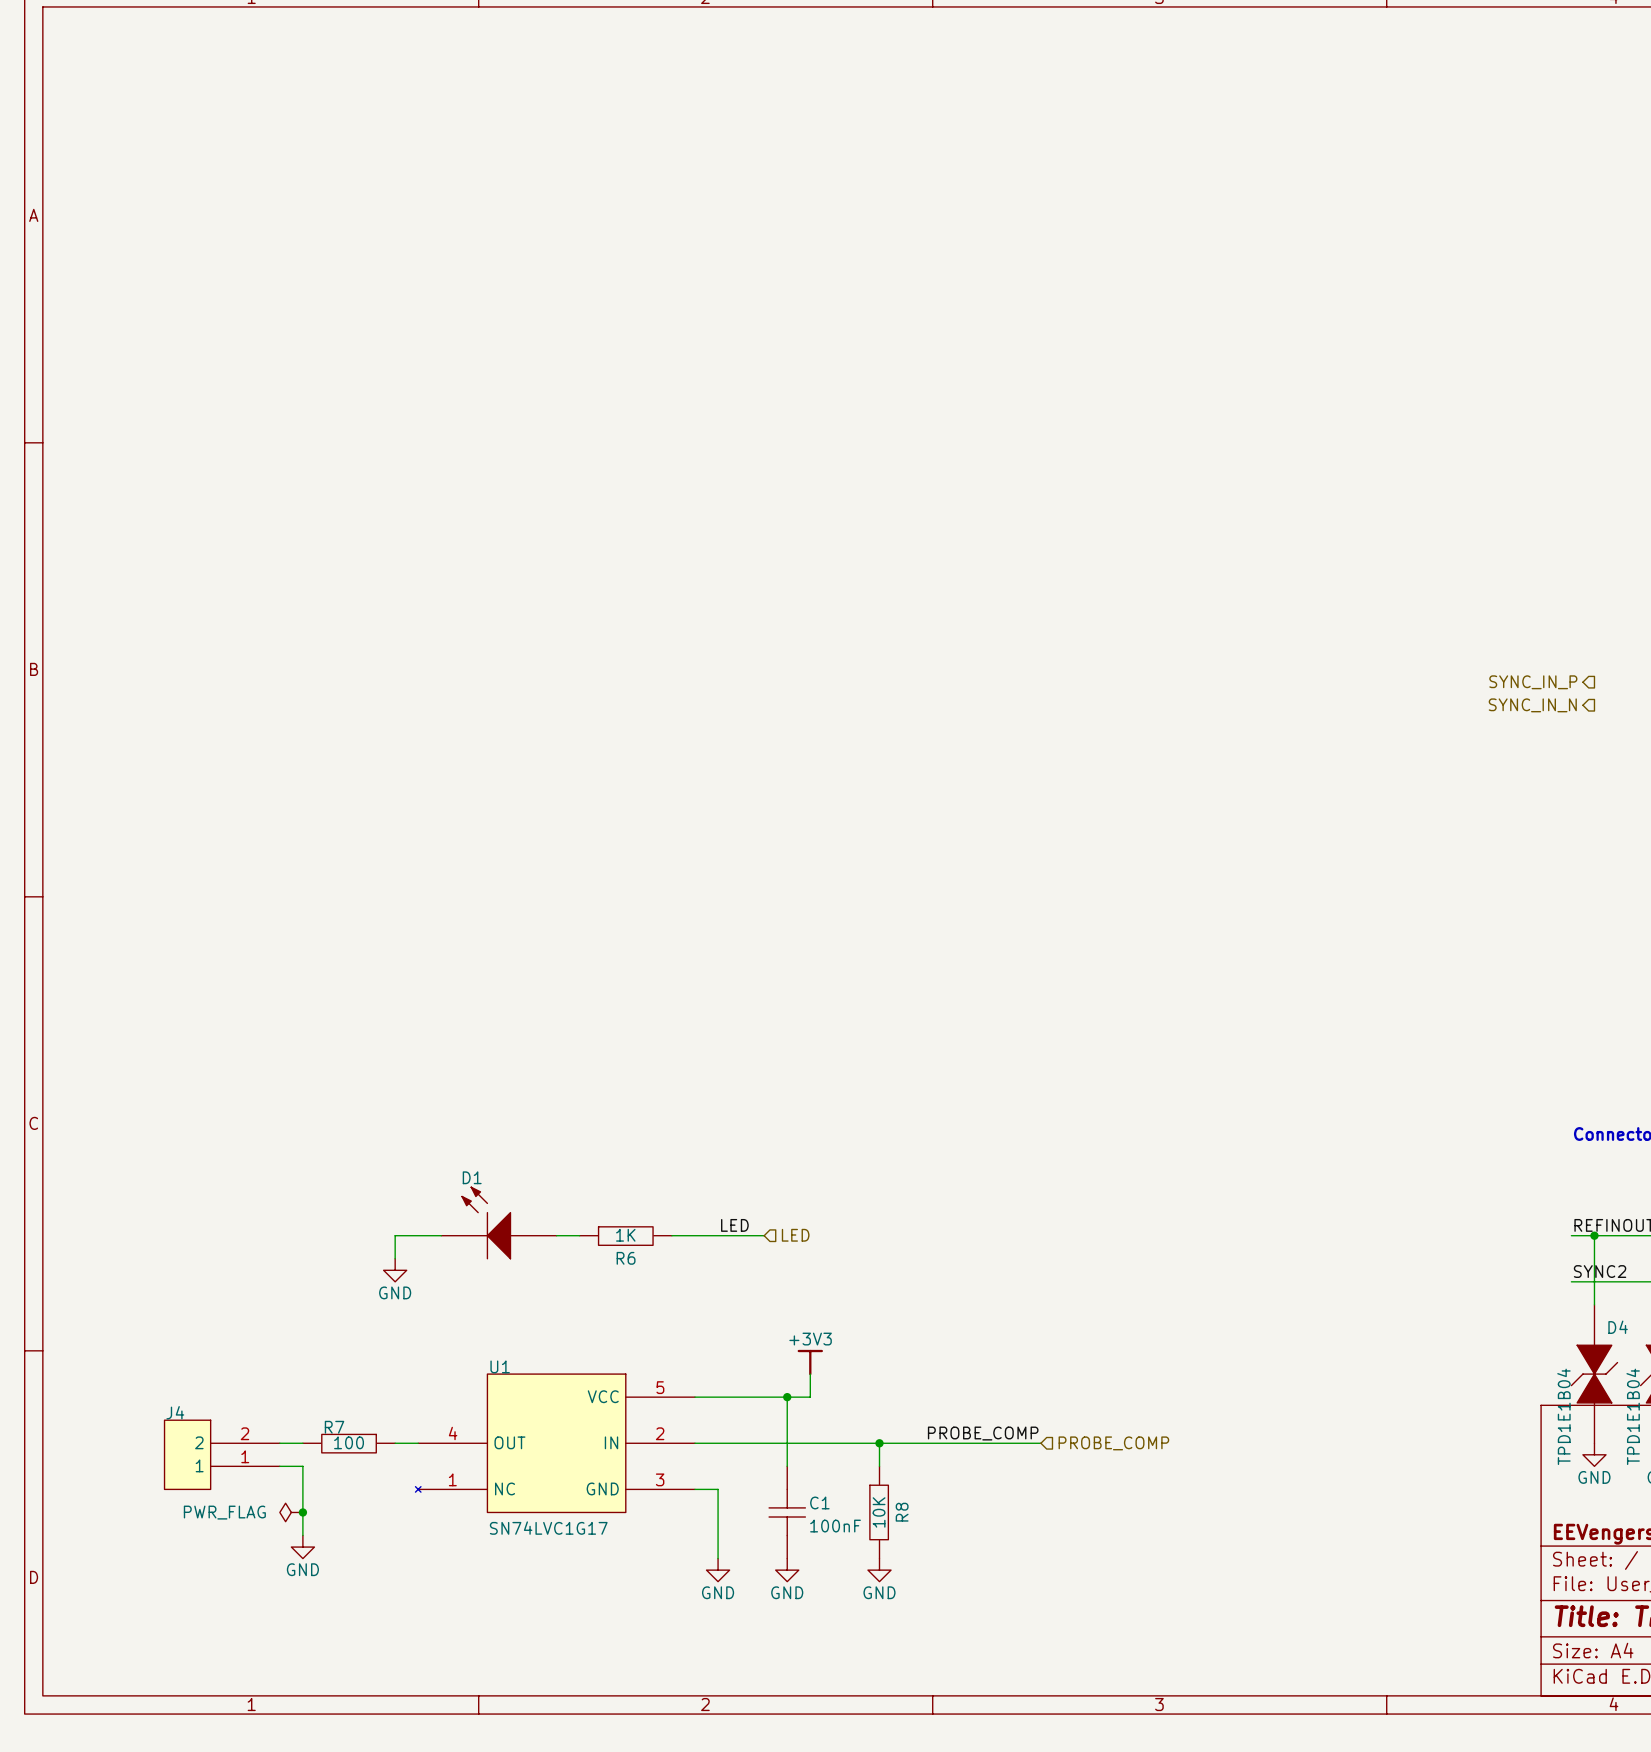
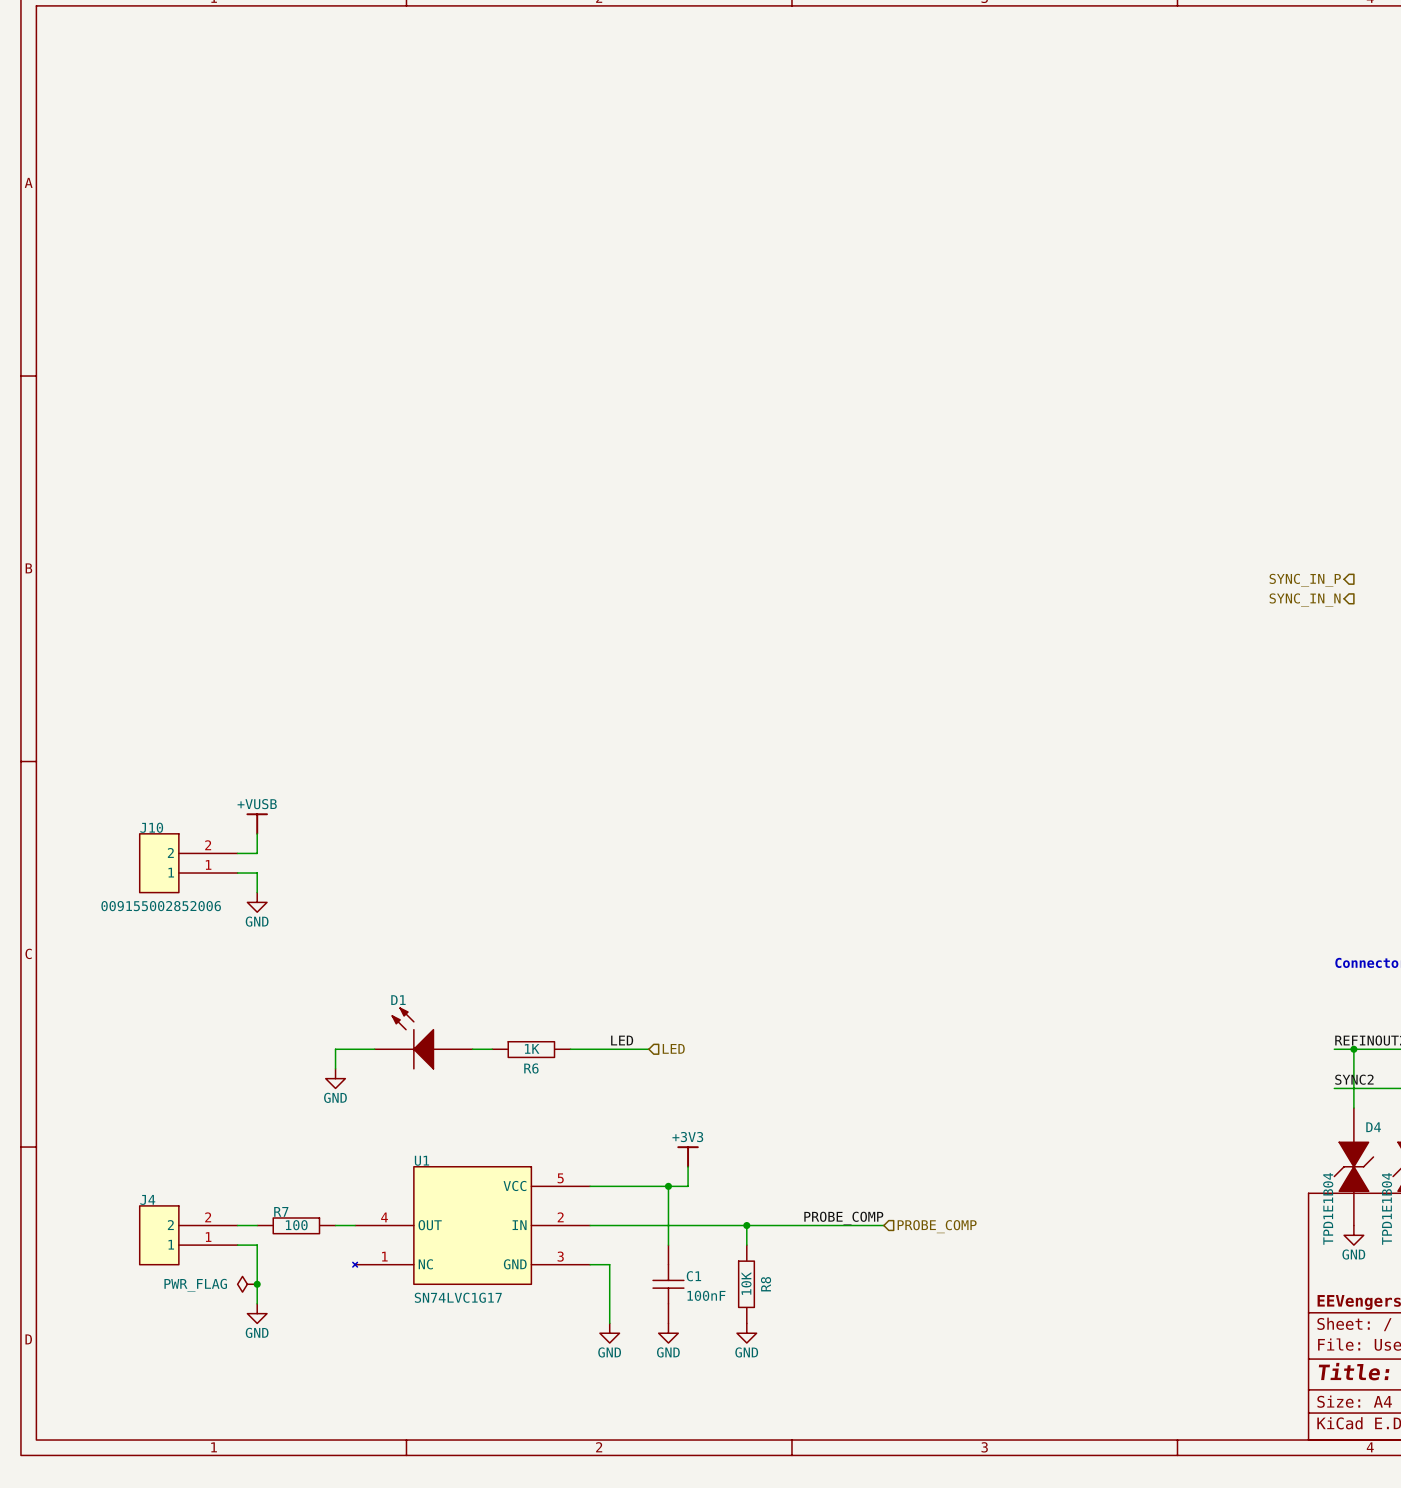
power symbol: none -> +VUSB (257, 824)
wire: none -> (257, 833) (257, 853) (237, 853)
J10: none -> 009155002852006 (188, 863)
wire: none -> (237, 873) (257, 873) (257, 892)
power symbol: none -> GND (257, 902)

